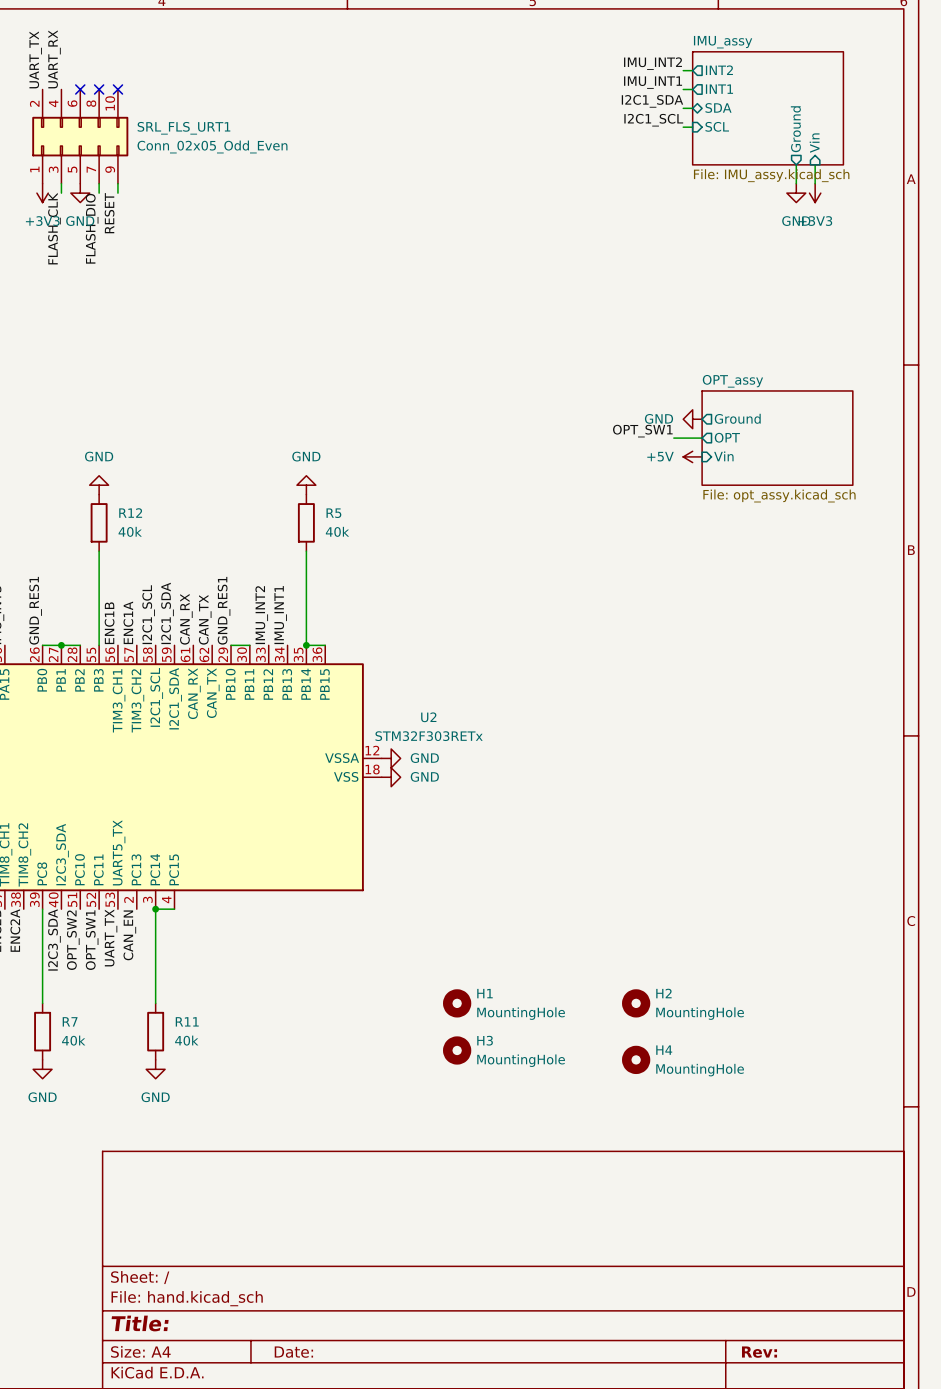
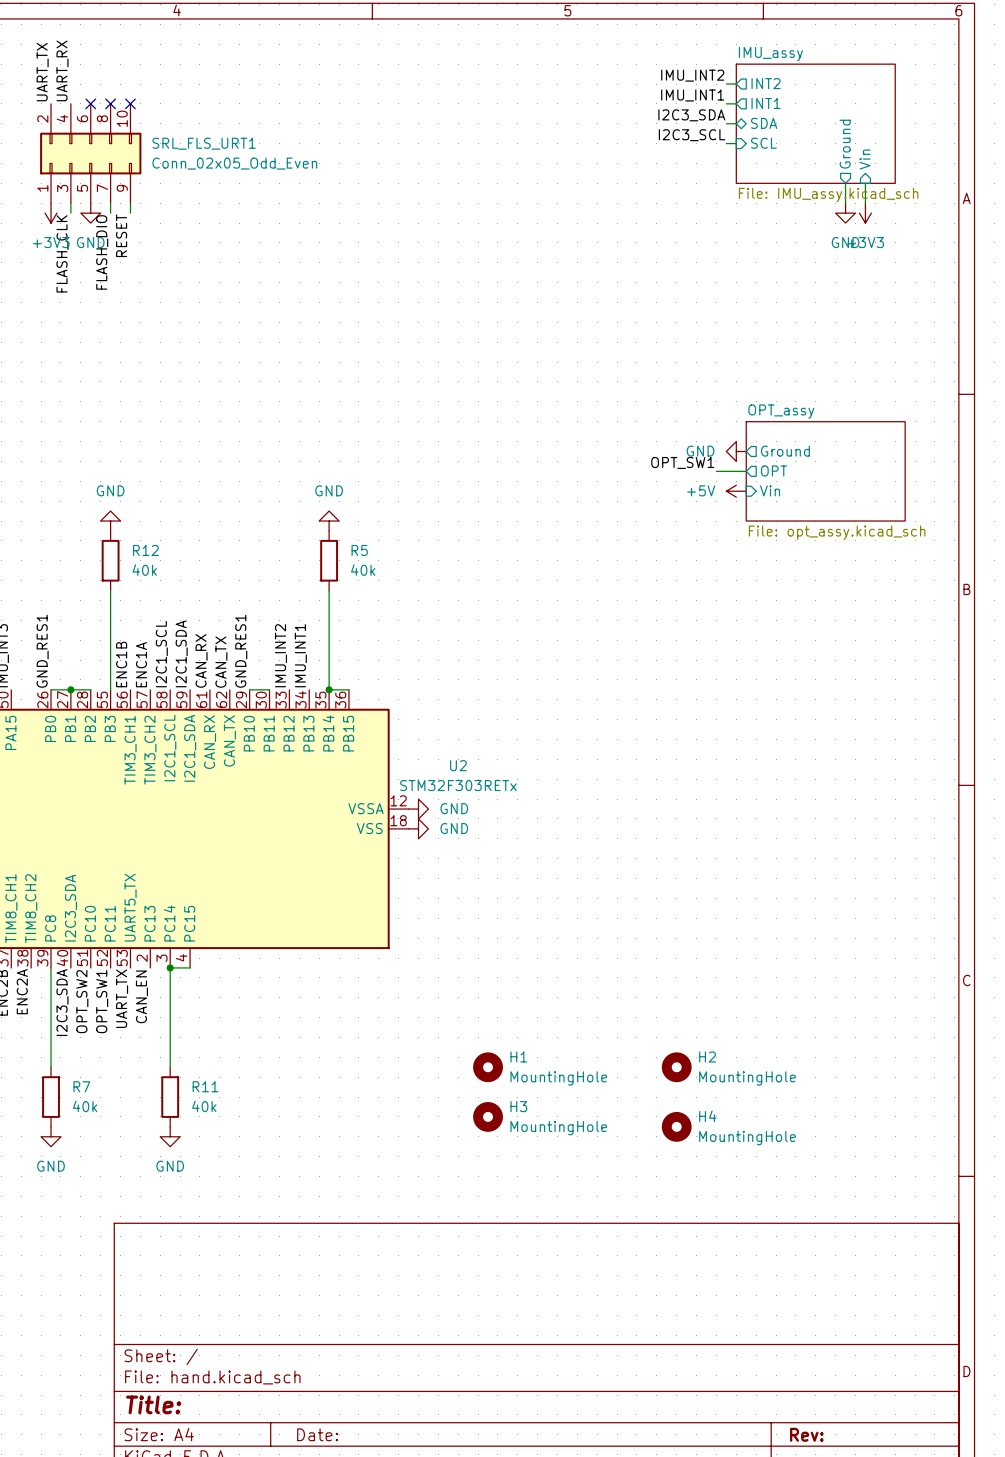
label: I2C1_SDA (652, 101) -> I2C3_SDA (691, 115)
label: I2C1_SCL (653, 120) -> I2C3_SCL (692, 135)

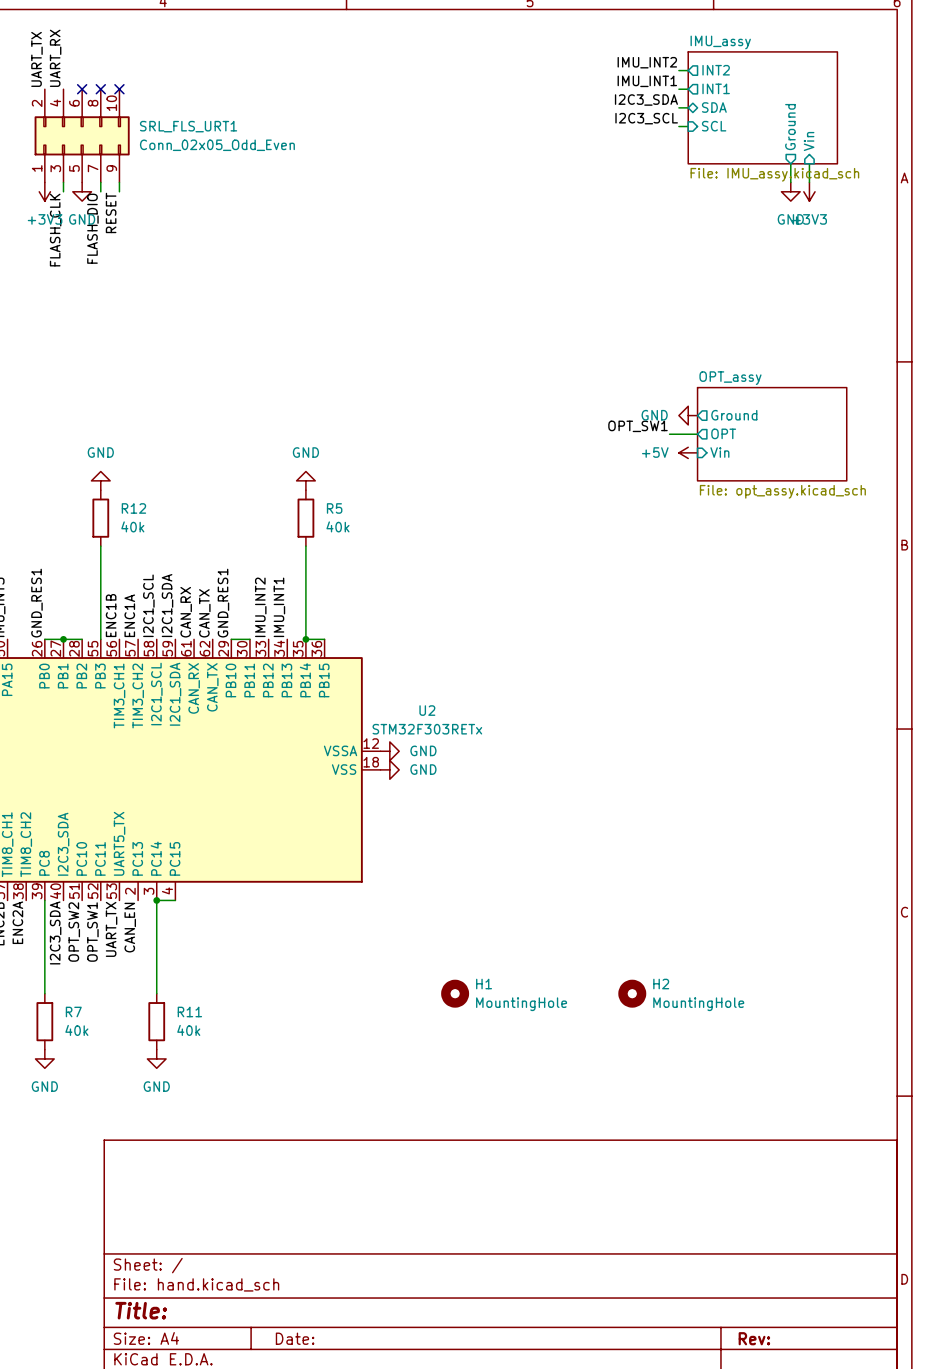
H3: MountingHole (488, 1116) -> none
H4: MountingHole (676, 1126) -> none

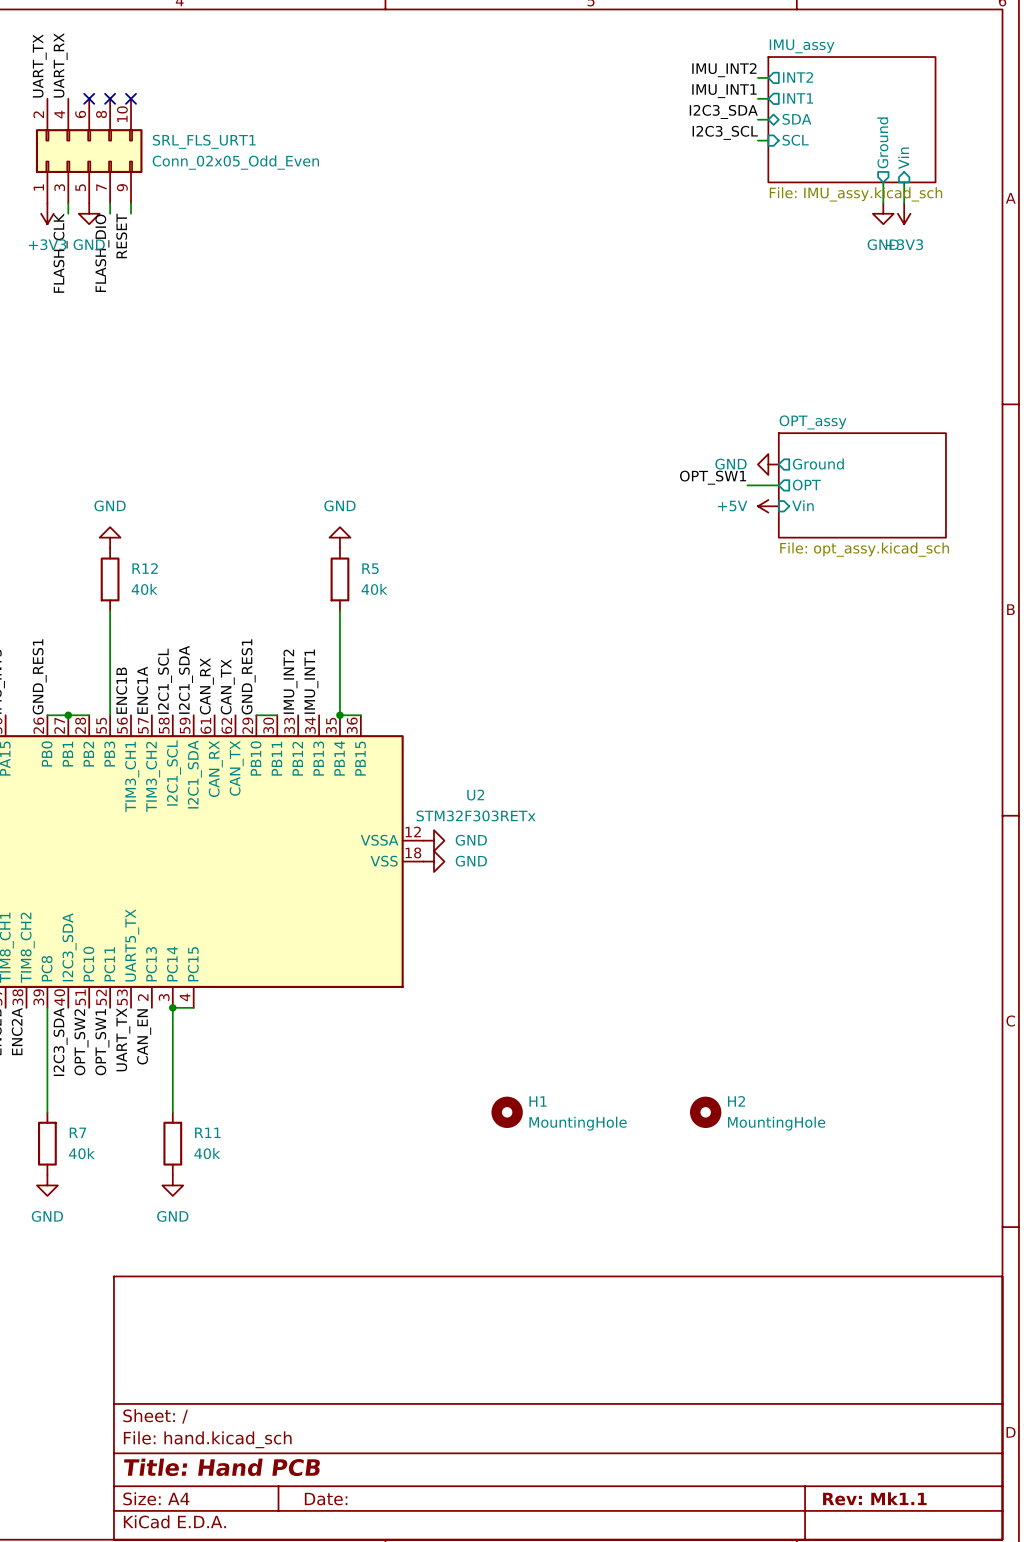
title block: Title: (141, 1310) -> Title: Hand PCB (222, 1467)
title block: Rev: (754, 1338) -> Rev: Mk1.1 (874, 1498)

